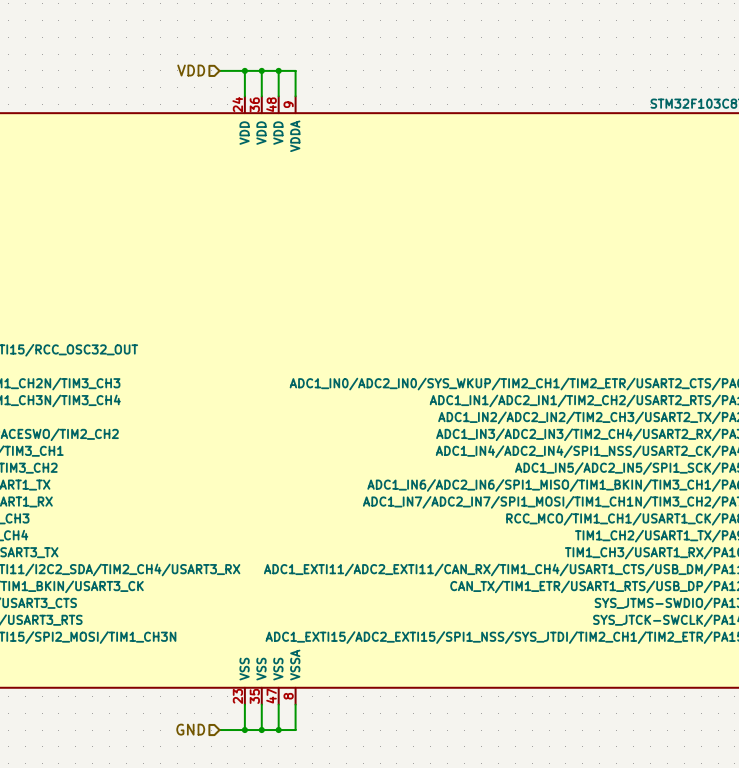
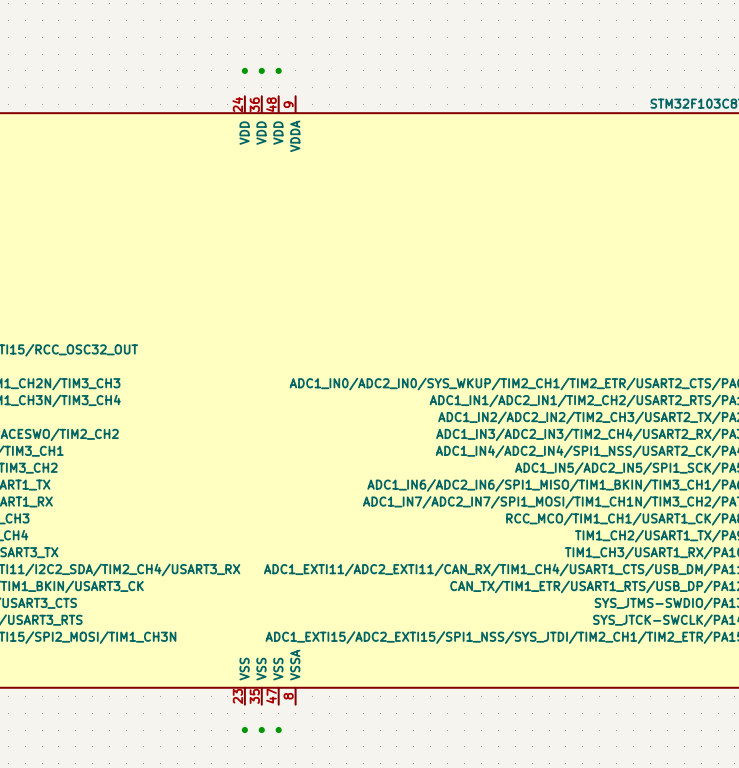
hierarchical label: VDD (191, 70) -> none
wire: (219, 70) (295, 70) (295, 96) -> none
wire: (244, 70) (244, 96) -> none
wire: (261, 70) (261, 96) -> none
wire: (278, 70) (278, 96) -> none
wire: (244, 704) (244, 730) -> none
wire: (261, 704) (261, 730) -> none
wire: (278, 704) (278, 730) -> none
wire: (295, 704) (295, 730) (219, 730) -> none
hierarchical label: GND (190, 729) -> none

